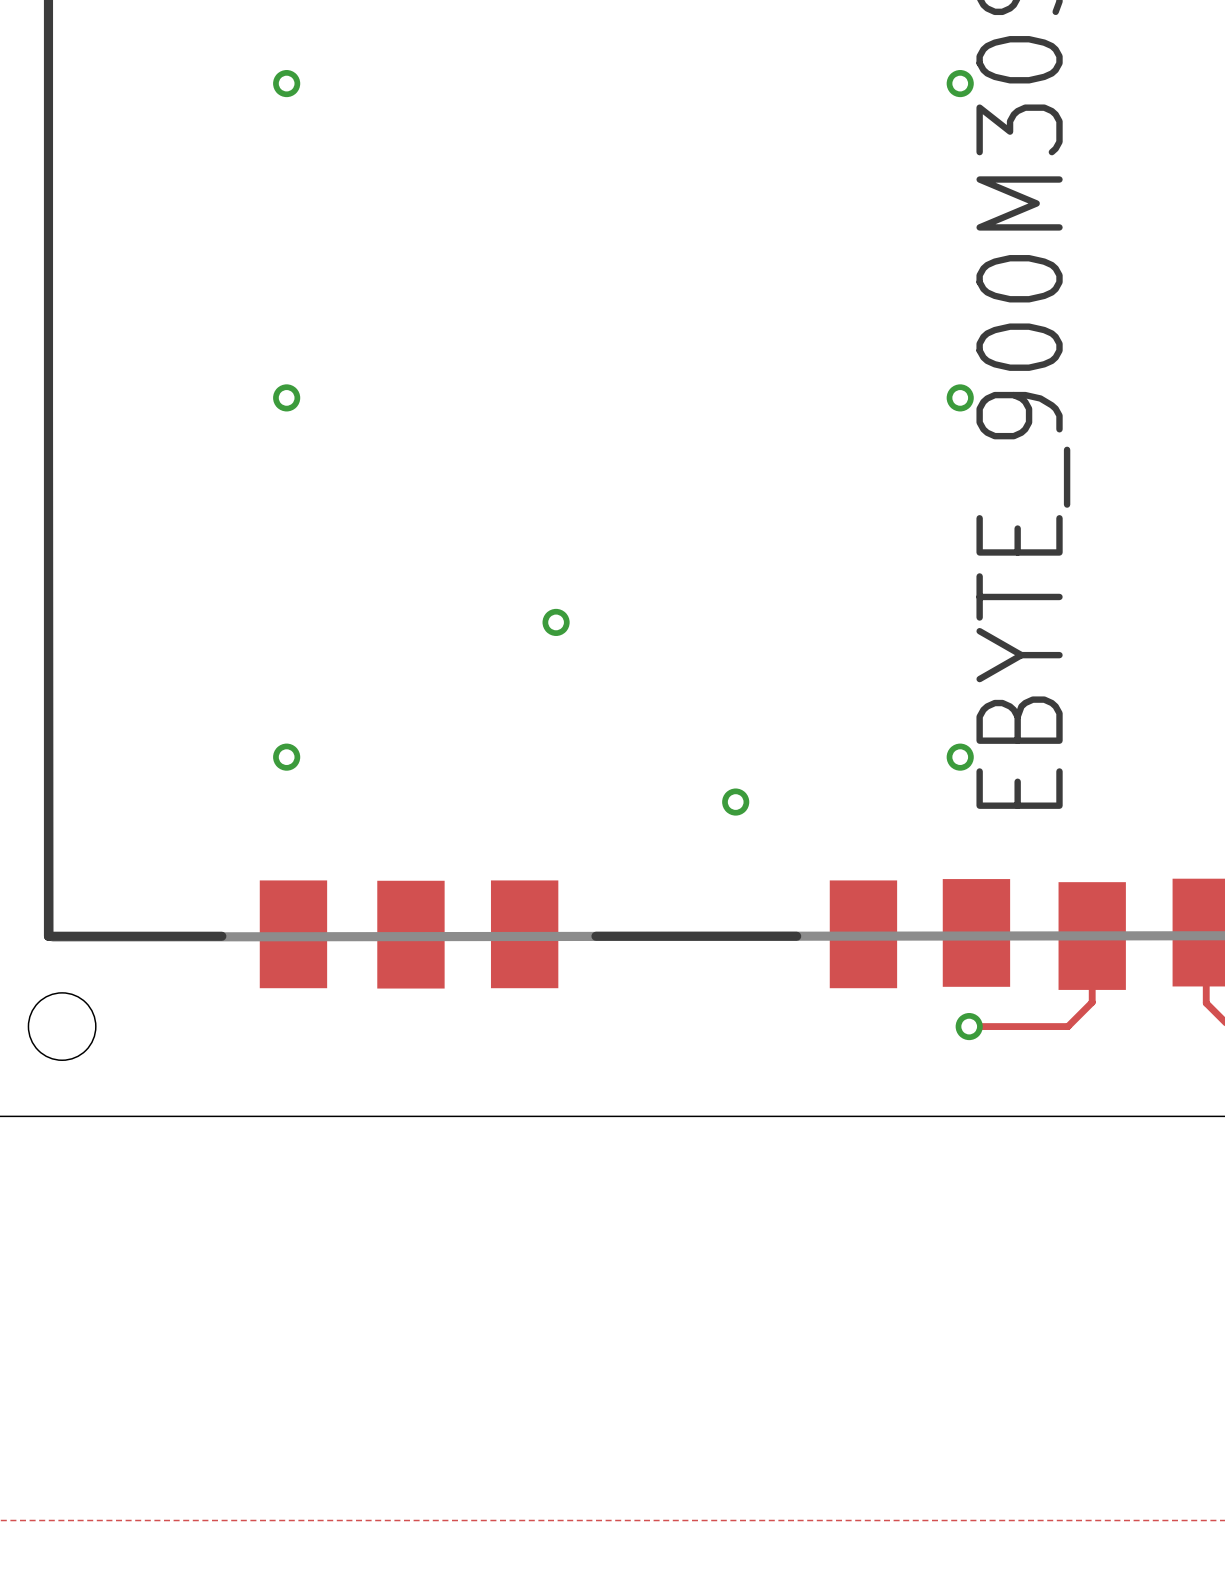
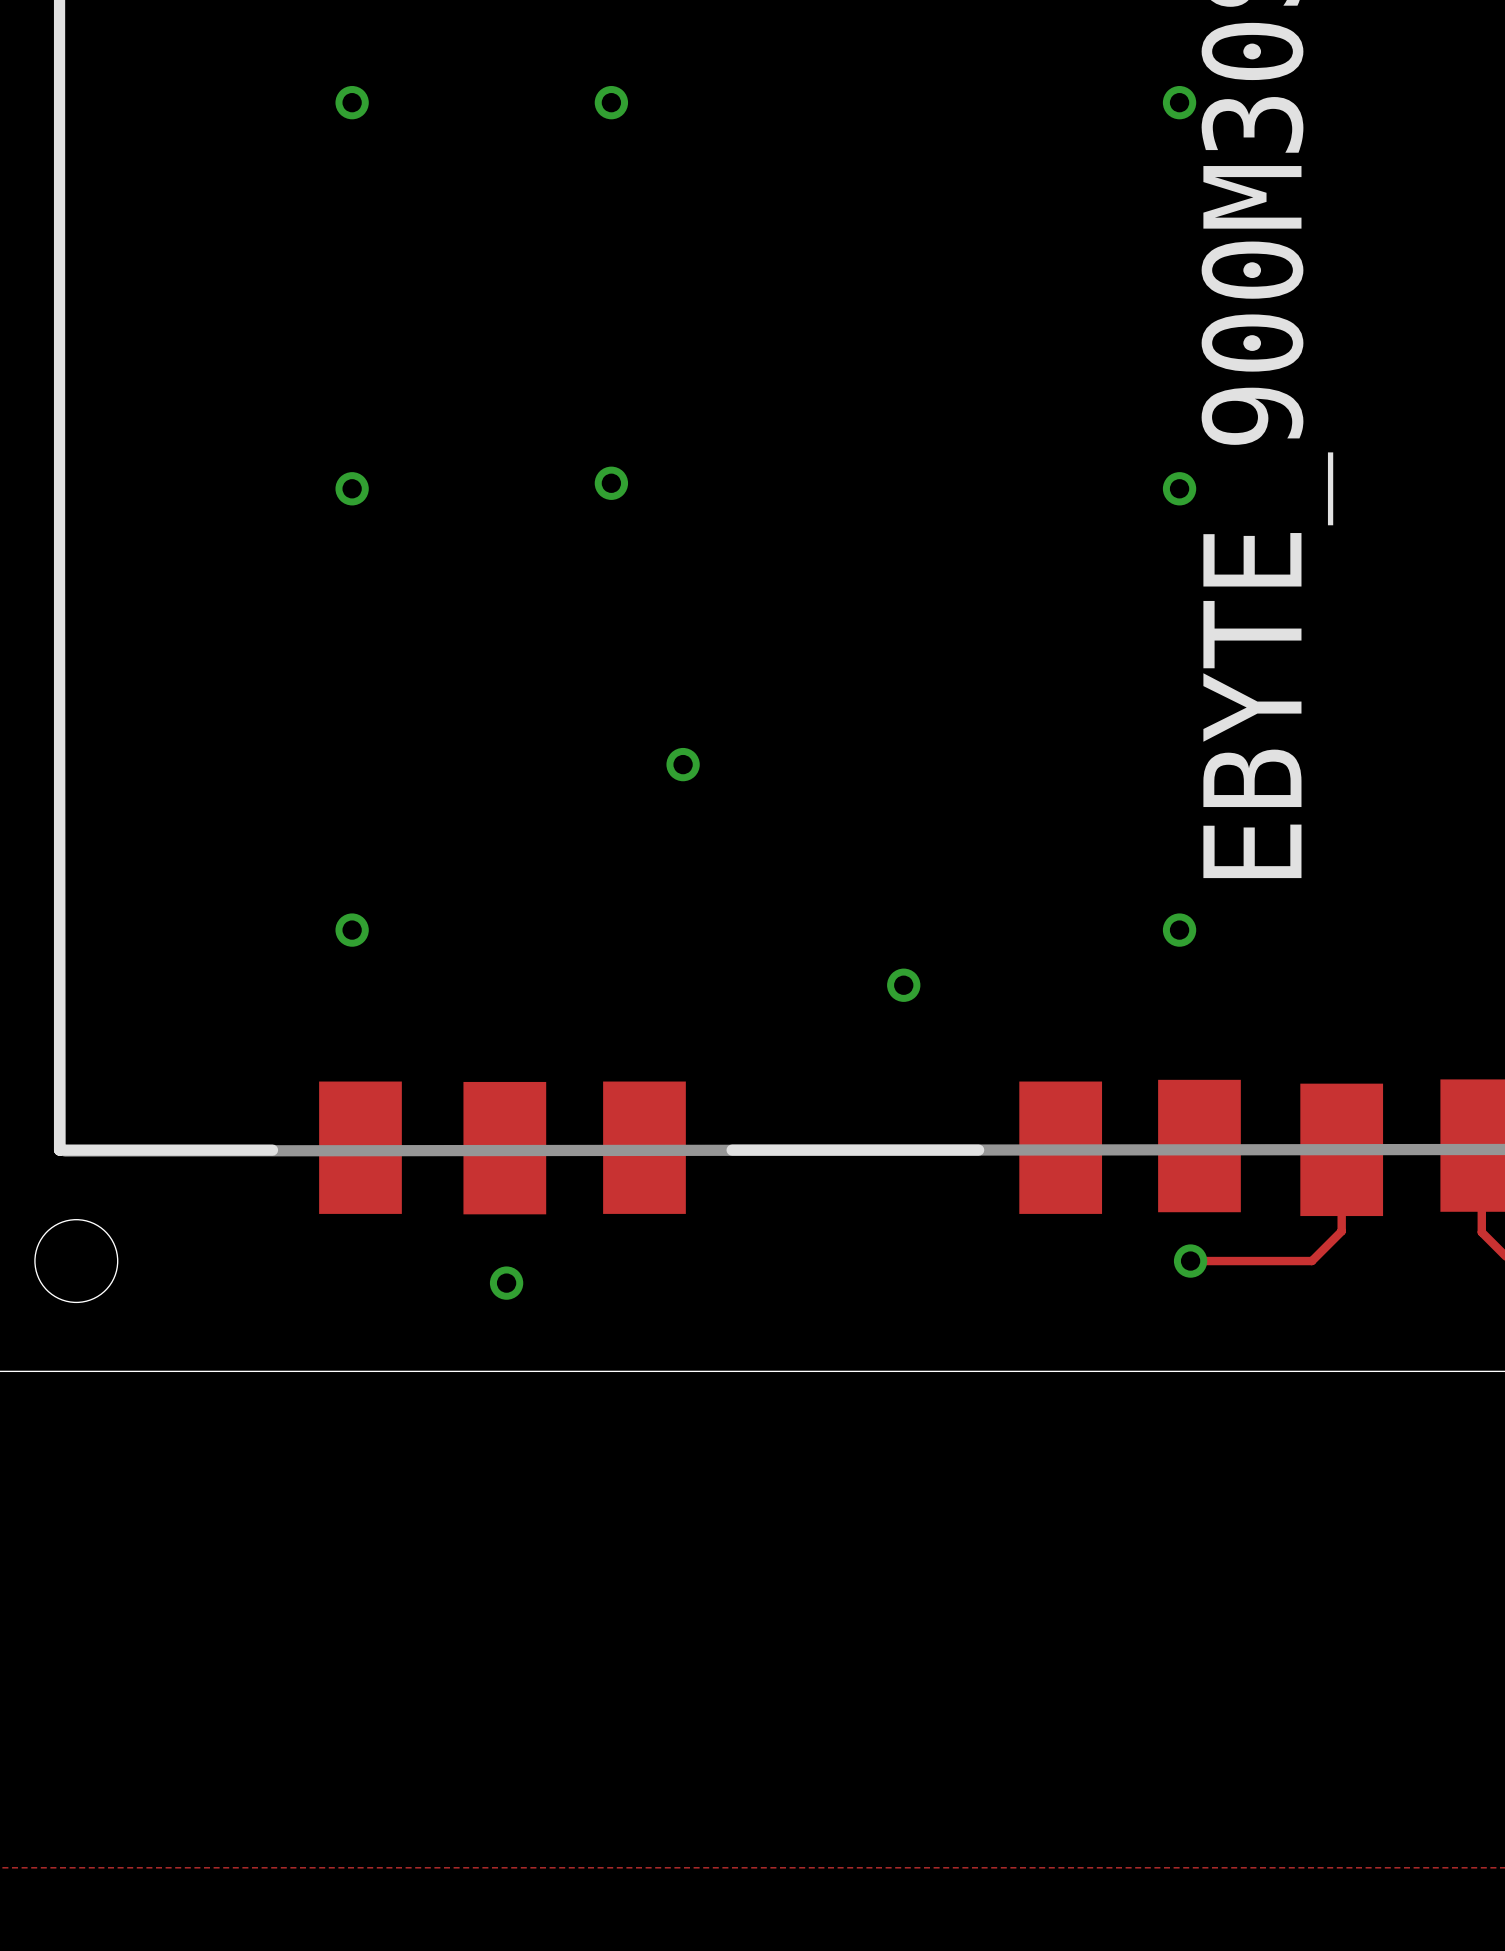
via: none -> (611, 102)
via: none -> (611, 483)
via: none -> (506, 1283)

